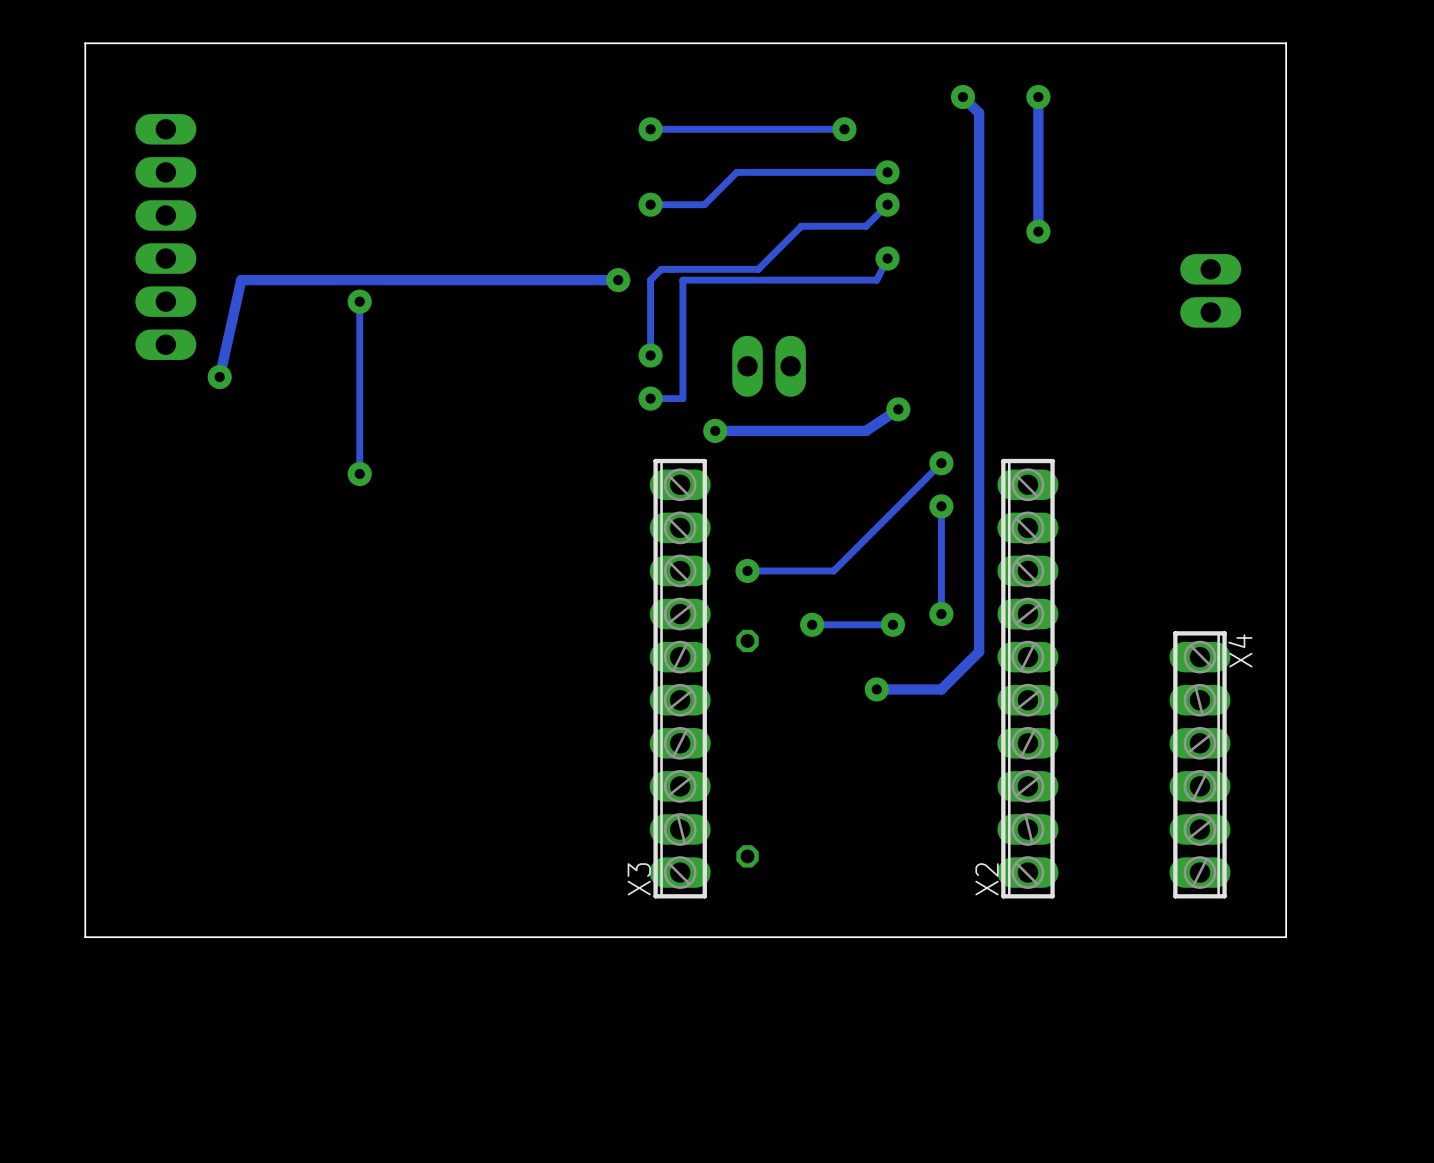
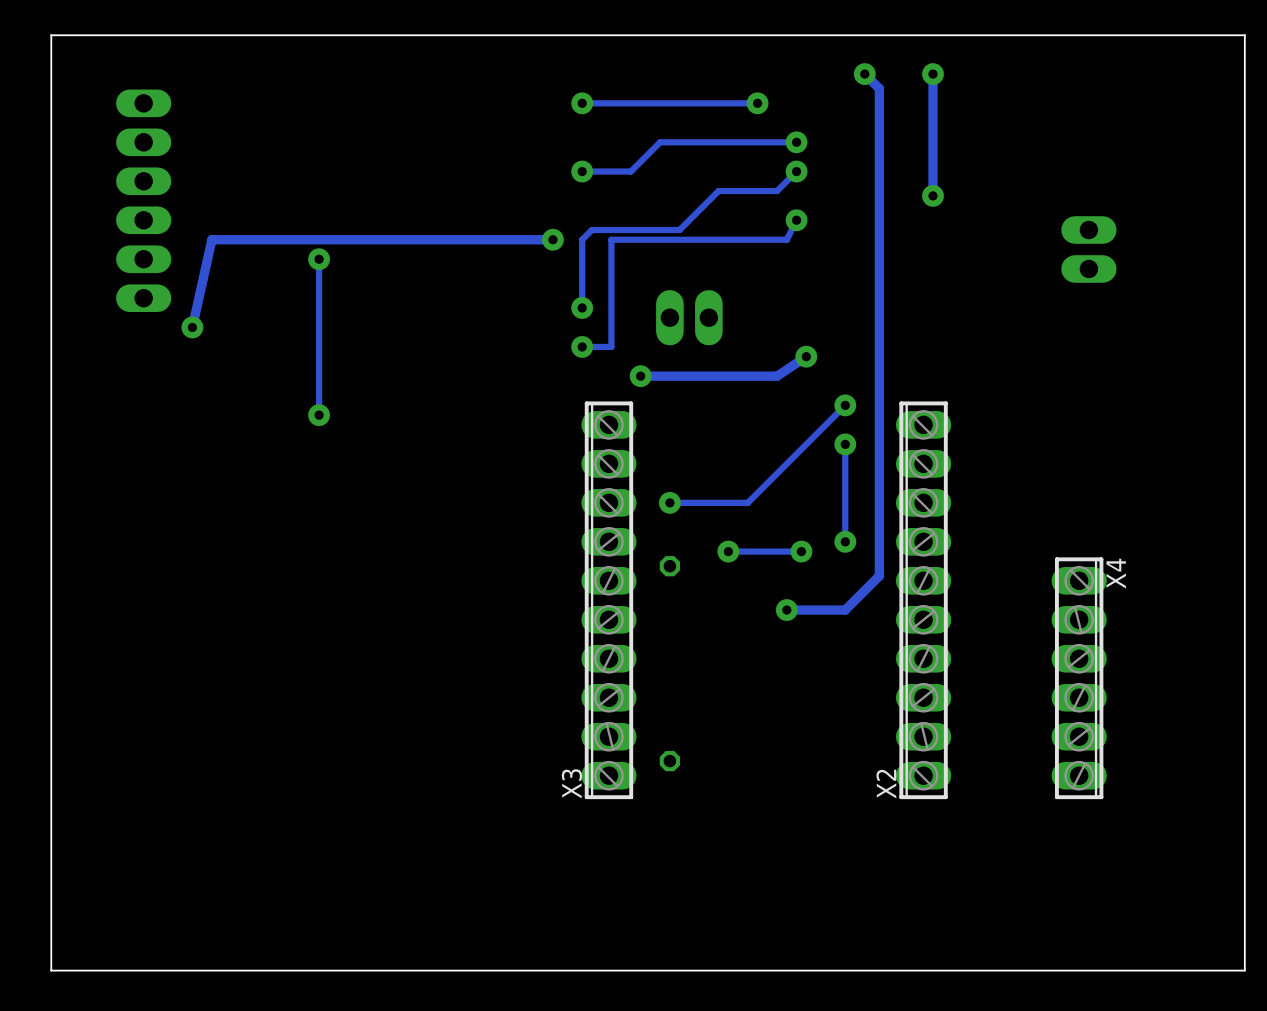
board edge: (1286, 43) (85, 43) (85, 937) (1286, 937) (1286, 43) -> (1244, 35) (1244, 970) (51, 970) (51, 35) (1244, 35)

